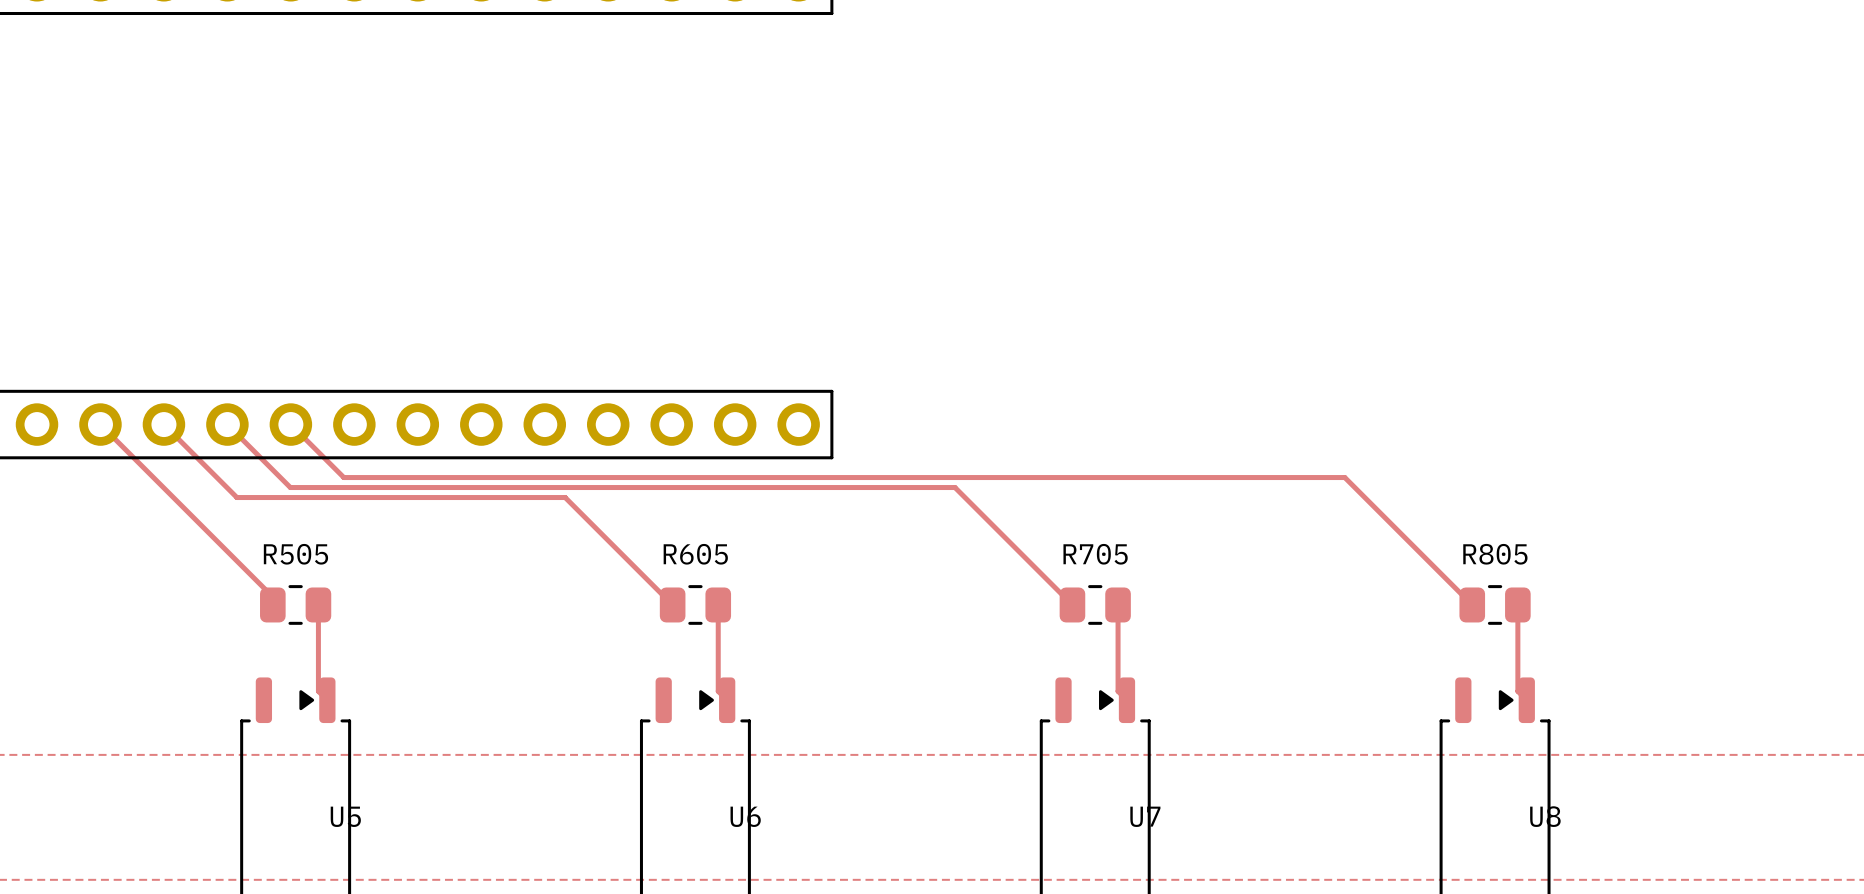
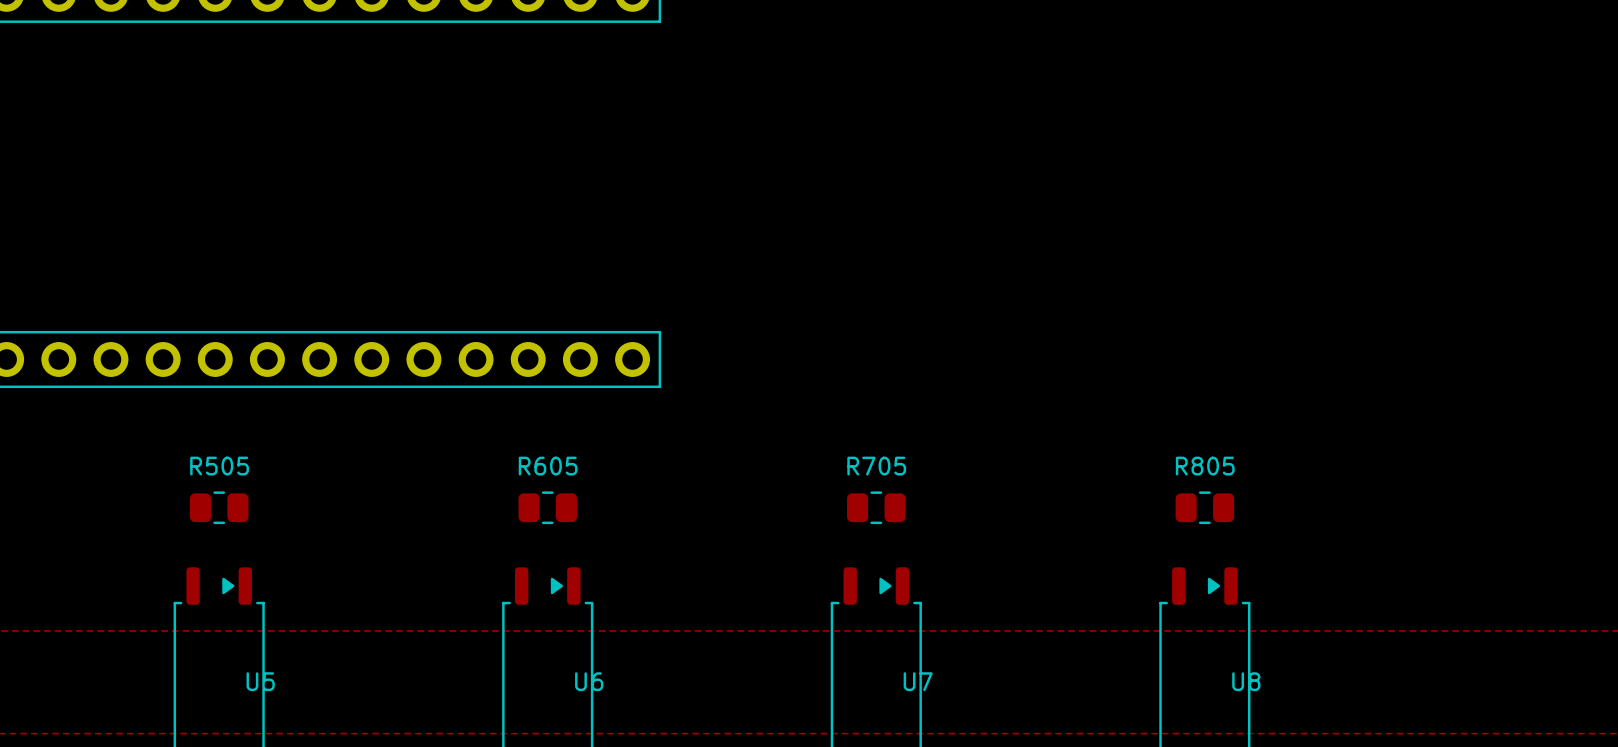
track: (100, 424) (272, 596) (272, 604) -> none
track: (163, 424) (236, 497) (565, 497) (672, 604) -> none
track: (227, 424) (290, 487) (955, 487) (1072, 604) -> none
track: (290, 424) (343, 477) (1344, 477) (1472, 604) -> none
track: (318, 604) (318, 691) (327, 700) -> none
track: (718, 604) (718, 691) (727, 700) -> none
track: (1118, 604) (1118, 691) (1126, 700) -> none
track: (1517, 604) (1517, 691) (1526, 700) -> none

